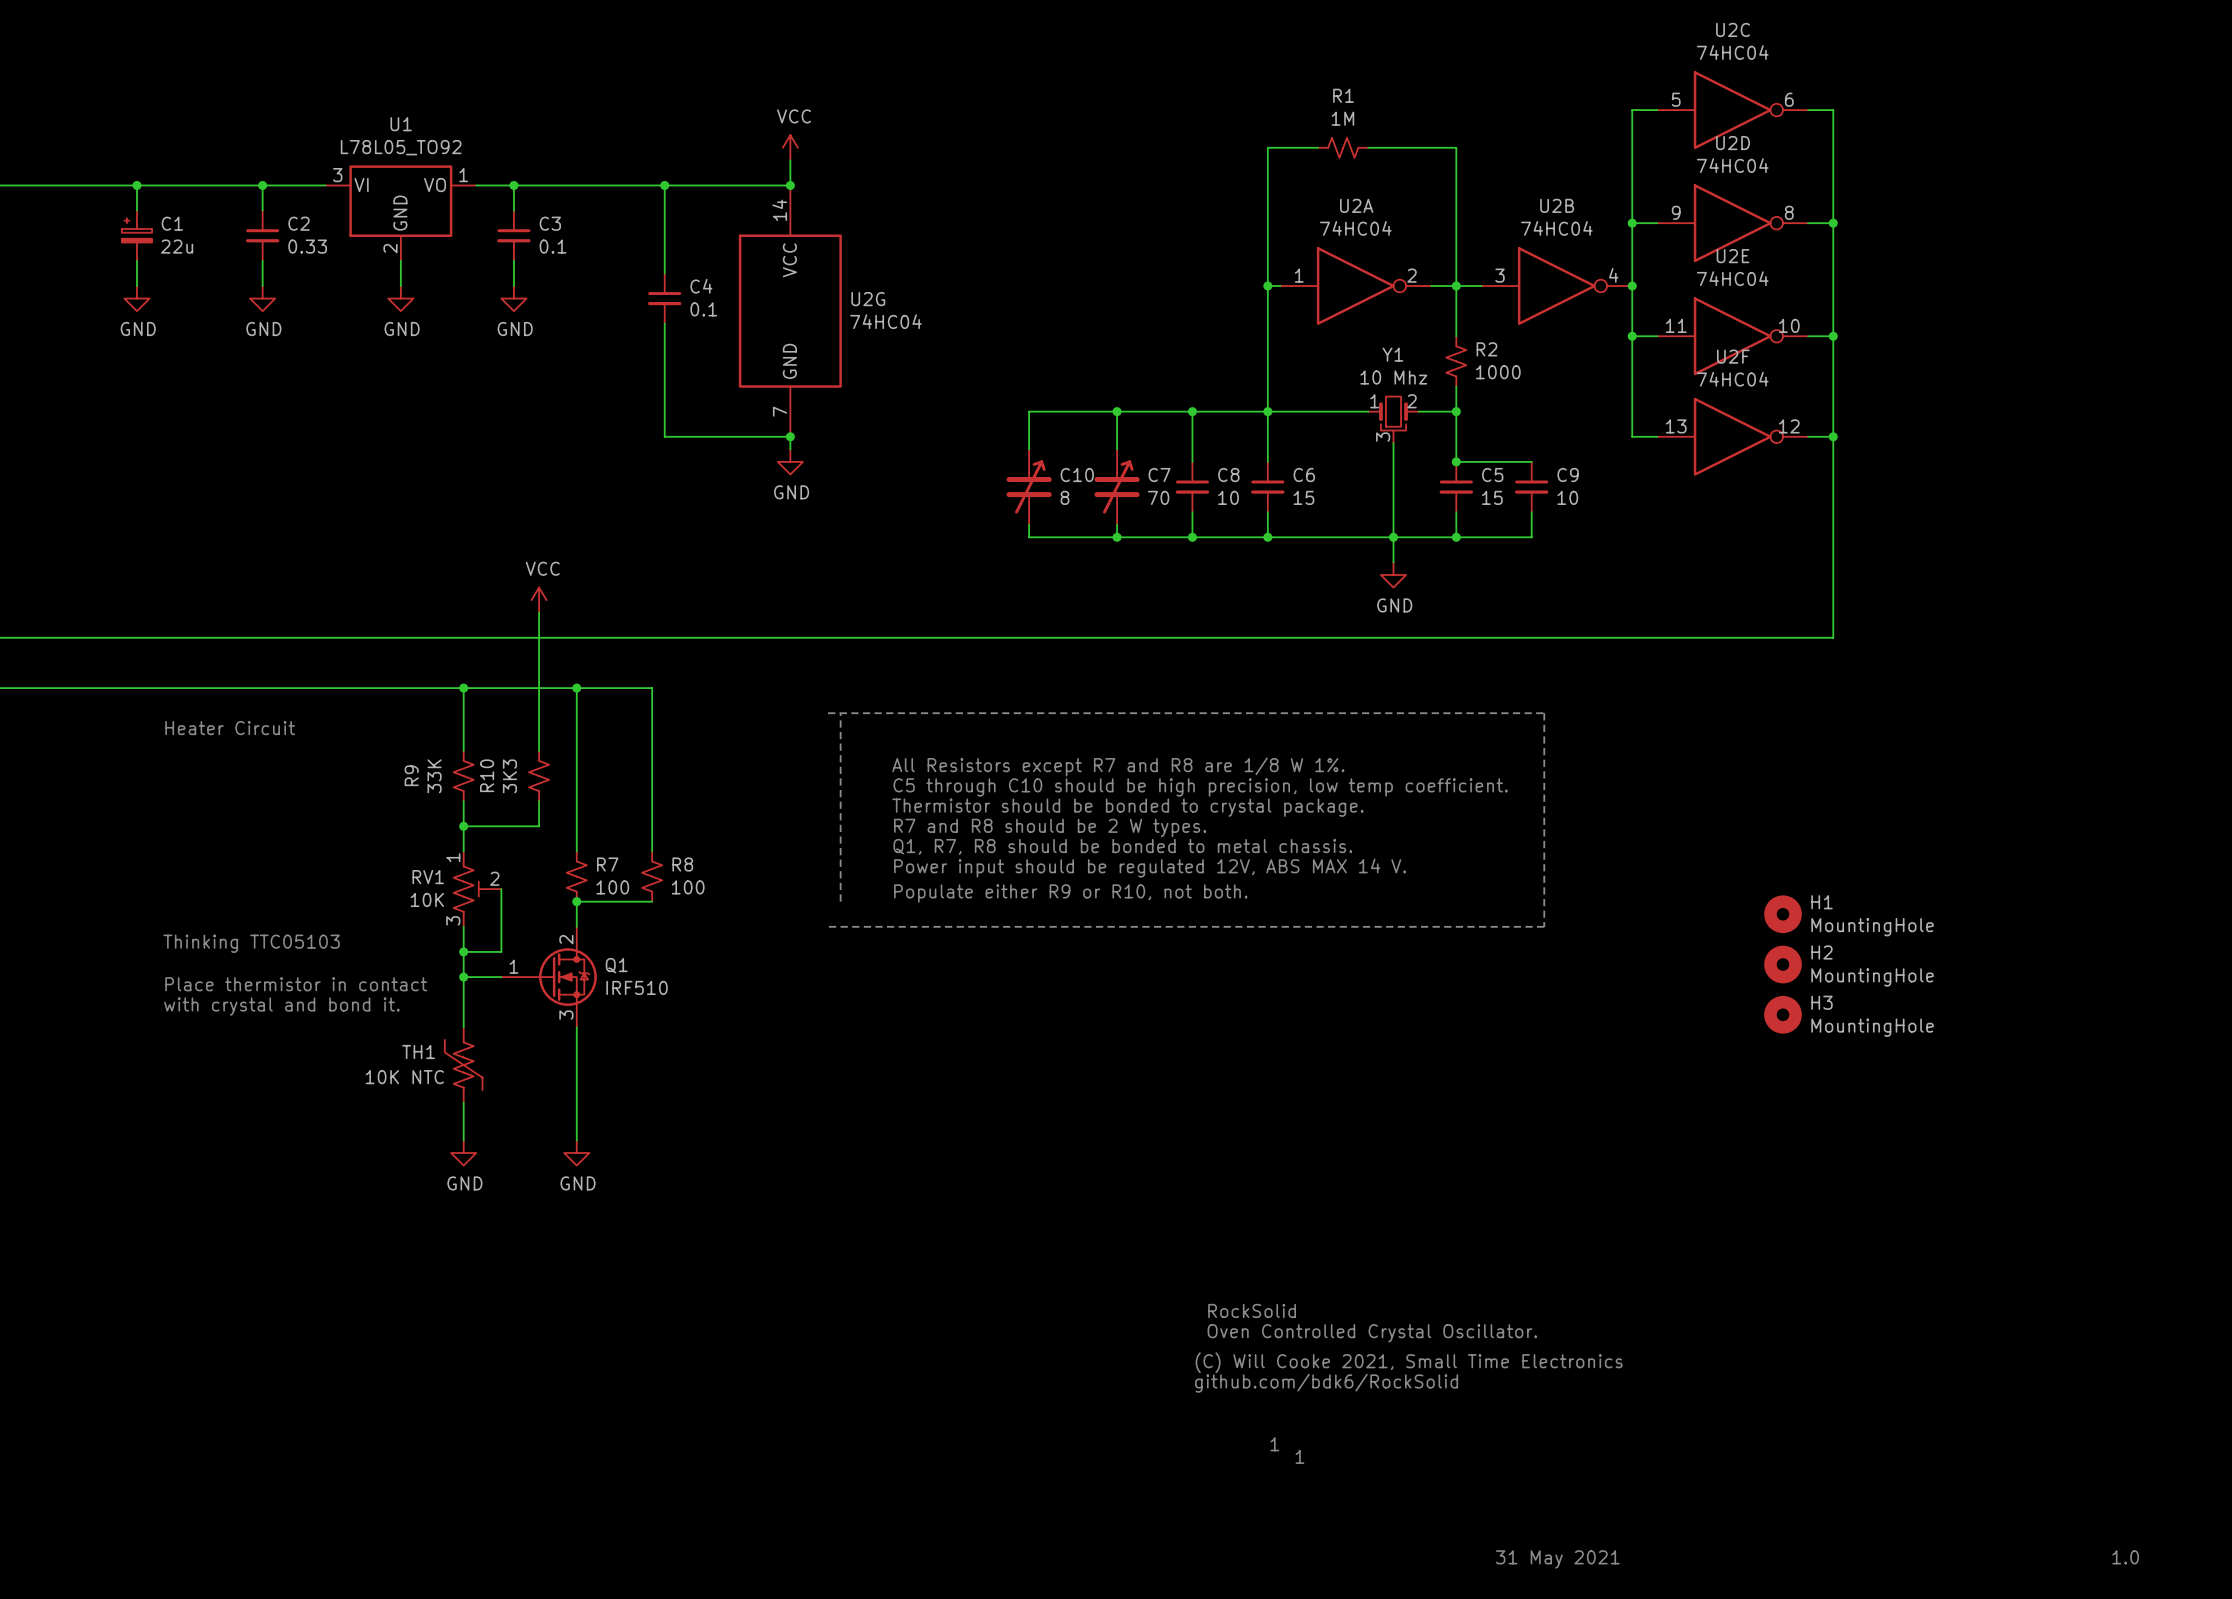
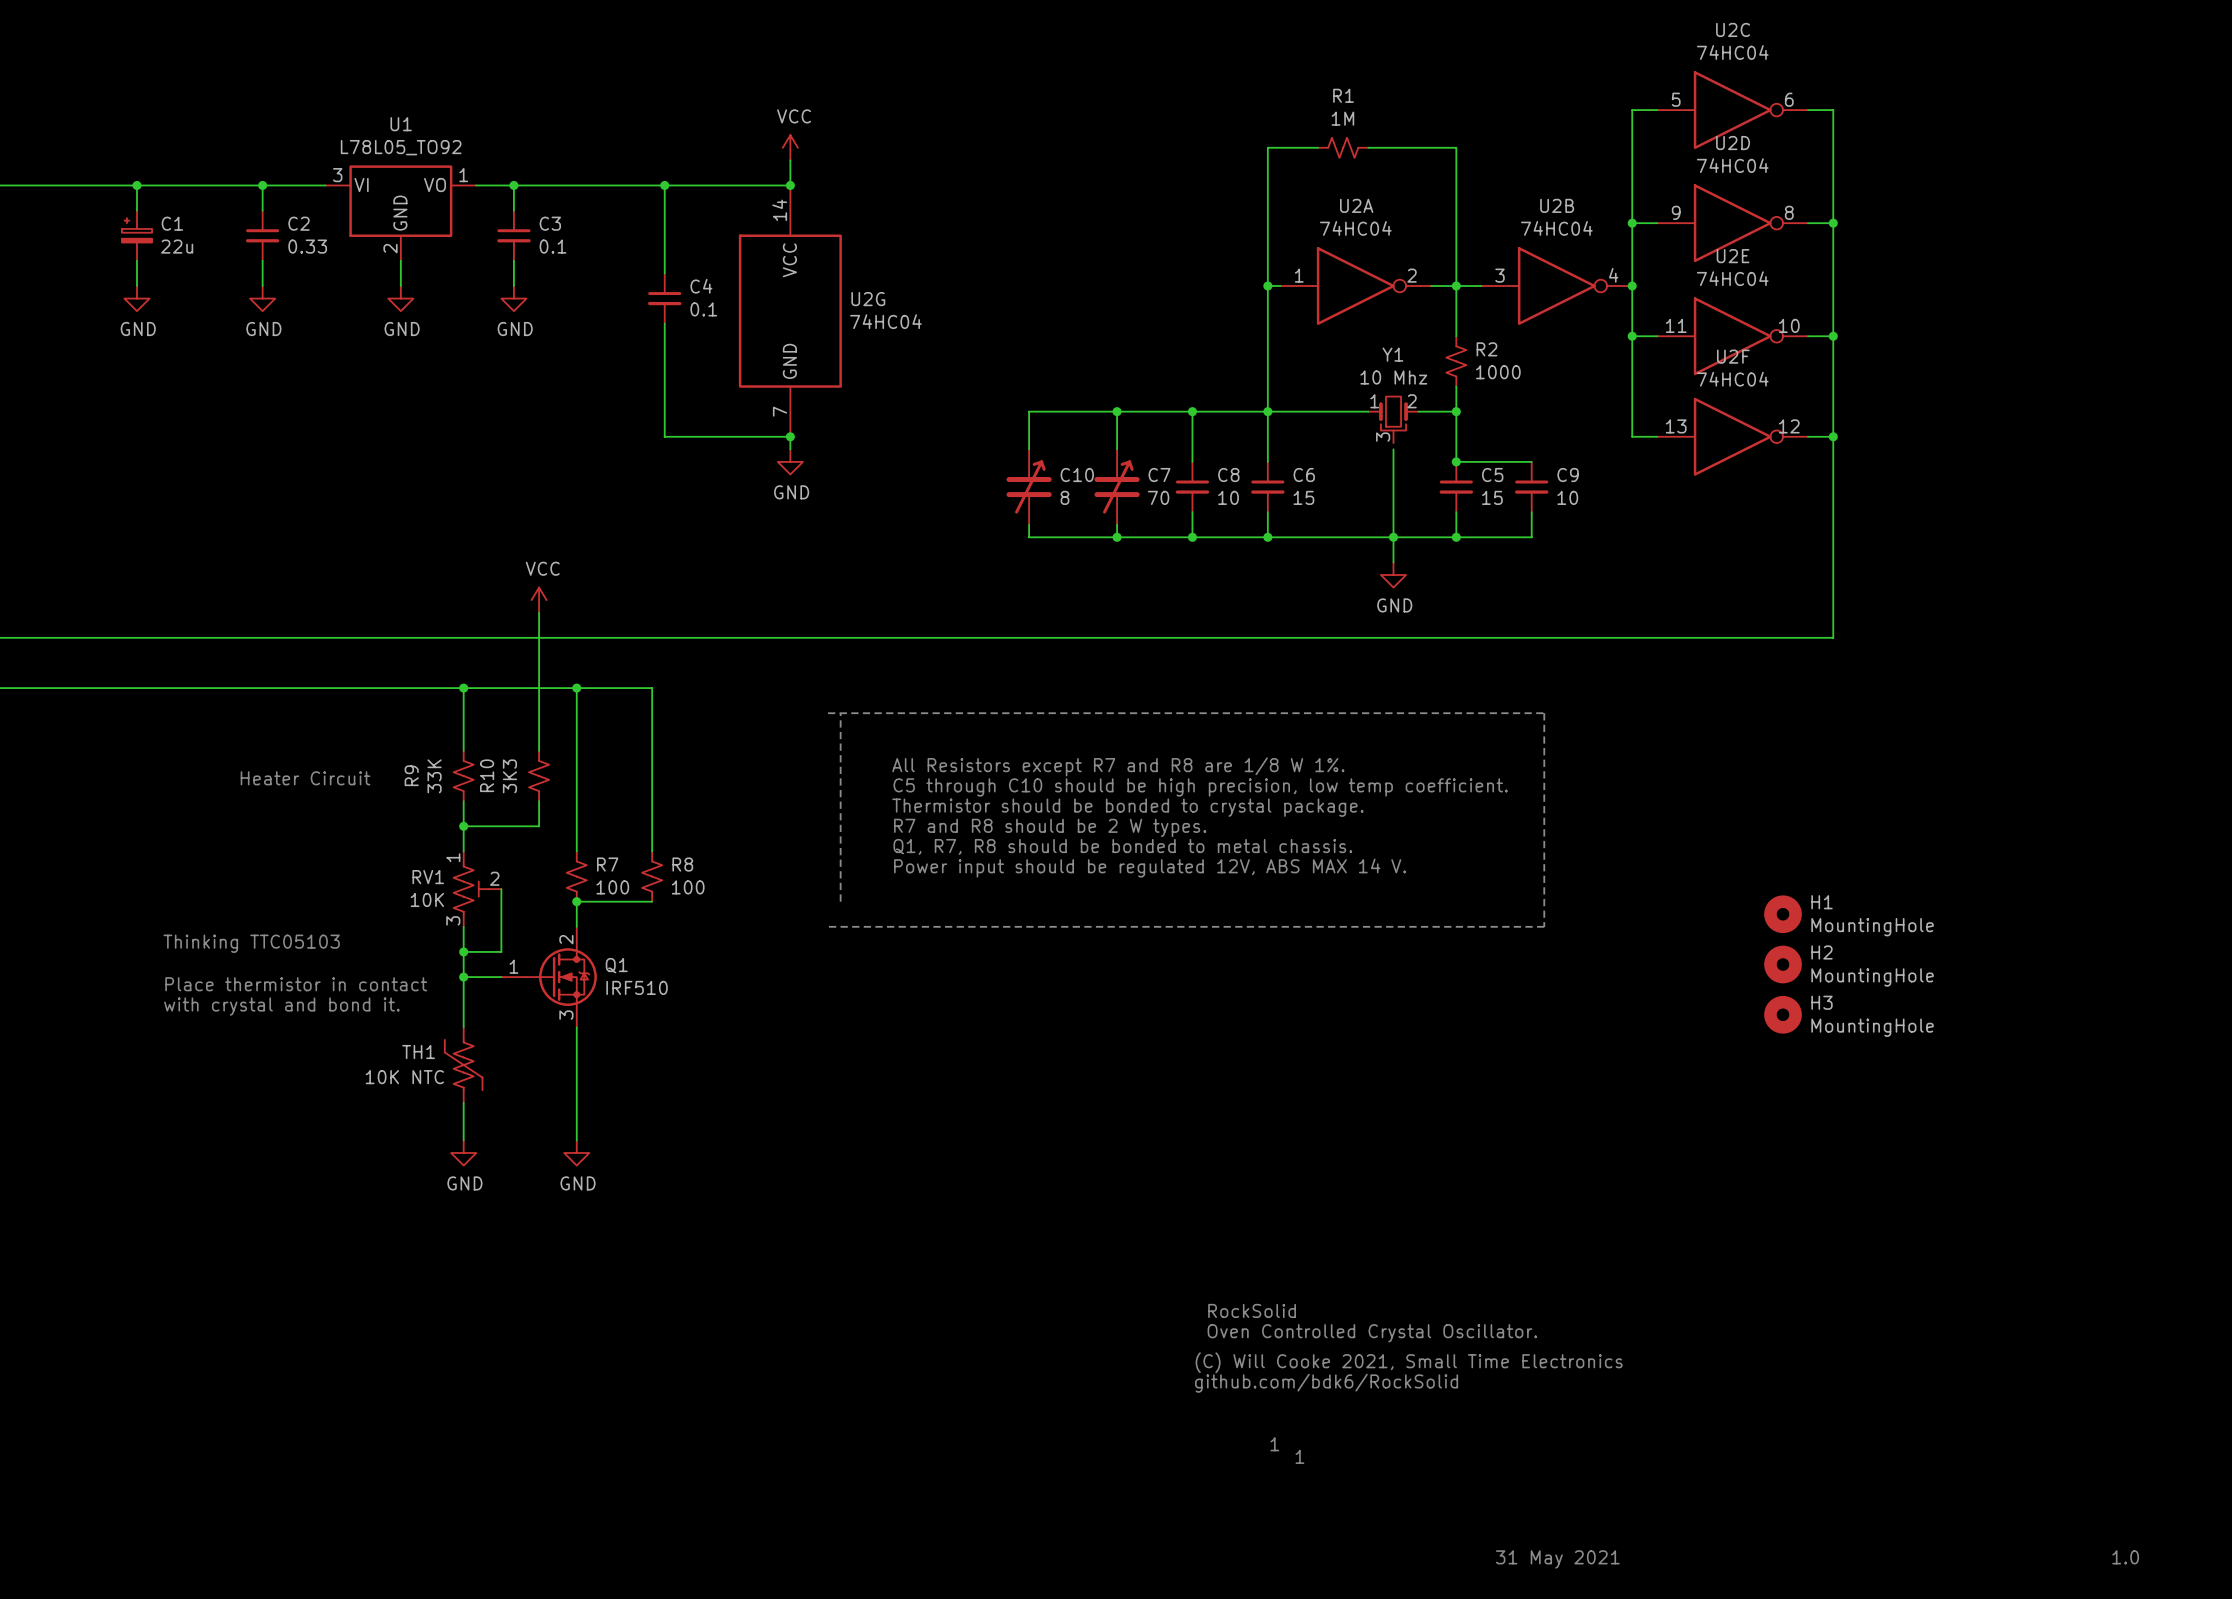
wire: (1393, 443) (1393, 449) -> none
text position: Heater Circuit (230, 728) -> Heater Circuit (305, 778)
text: Populate either R9 or R10, not both. (1070, 893) -> none

